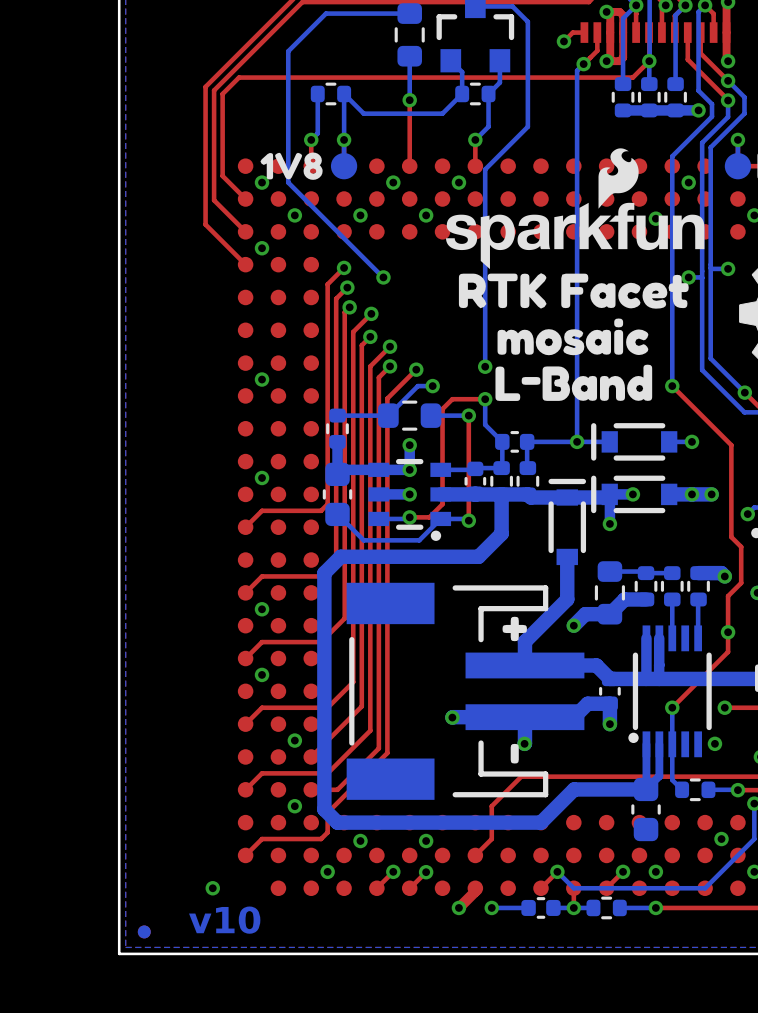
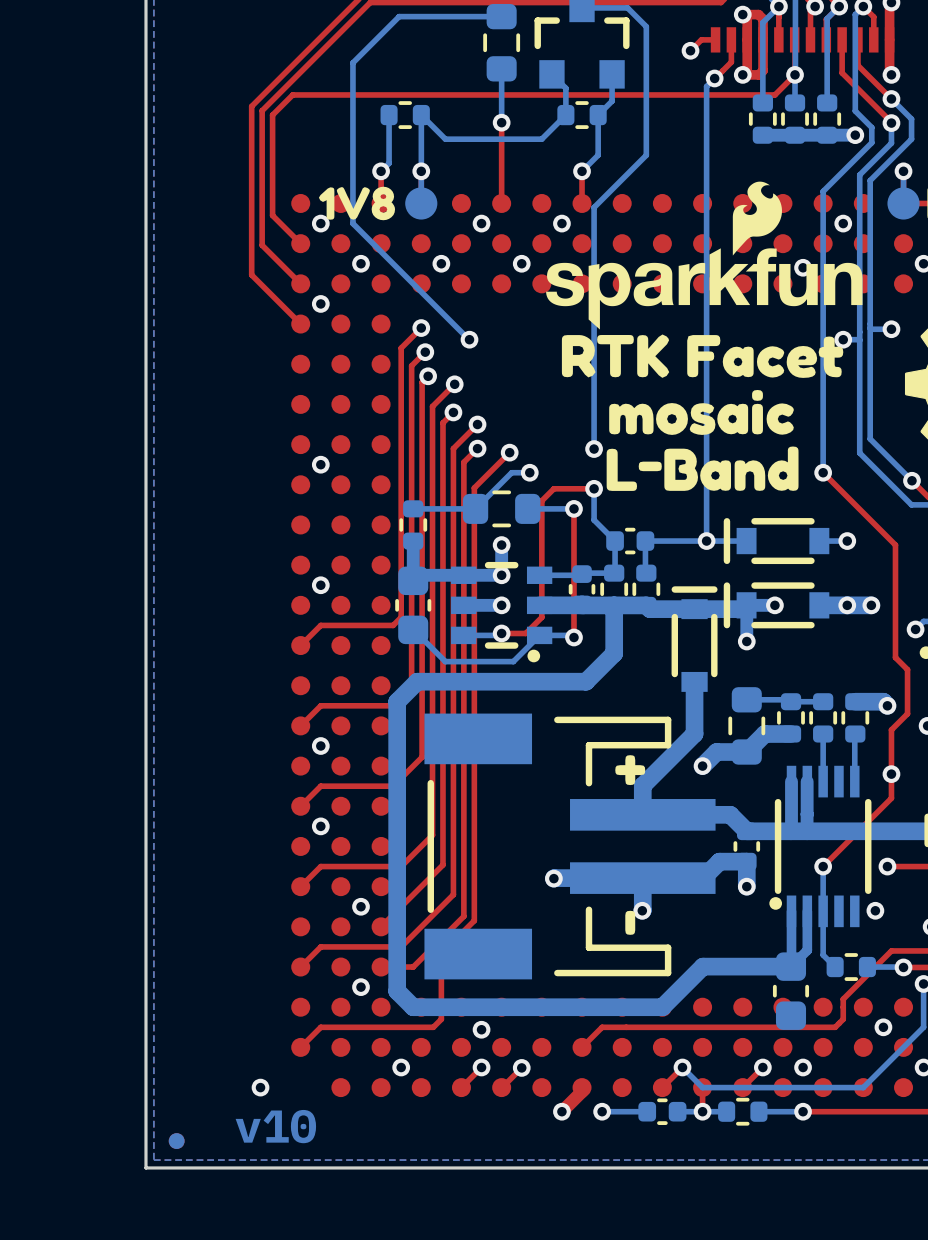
top track: (387, 751) (327, 812) (327, 832) (321, 839) -> (474, 920) (441, 953) (441, 1019) (433, 1027) (393, 1027)
top track: (728, 776) (521, 776) (491, 806) (491, 839) -> (891, 950) (843, 999) (843, 1019) (835, 1027) (602, 1027)
via: (360, 841) -> none
via: none -> (481, 1029)
via: (426, 841) -> none

